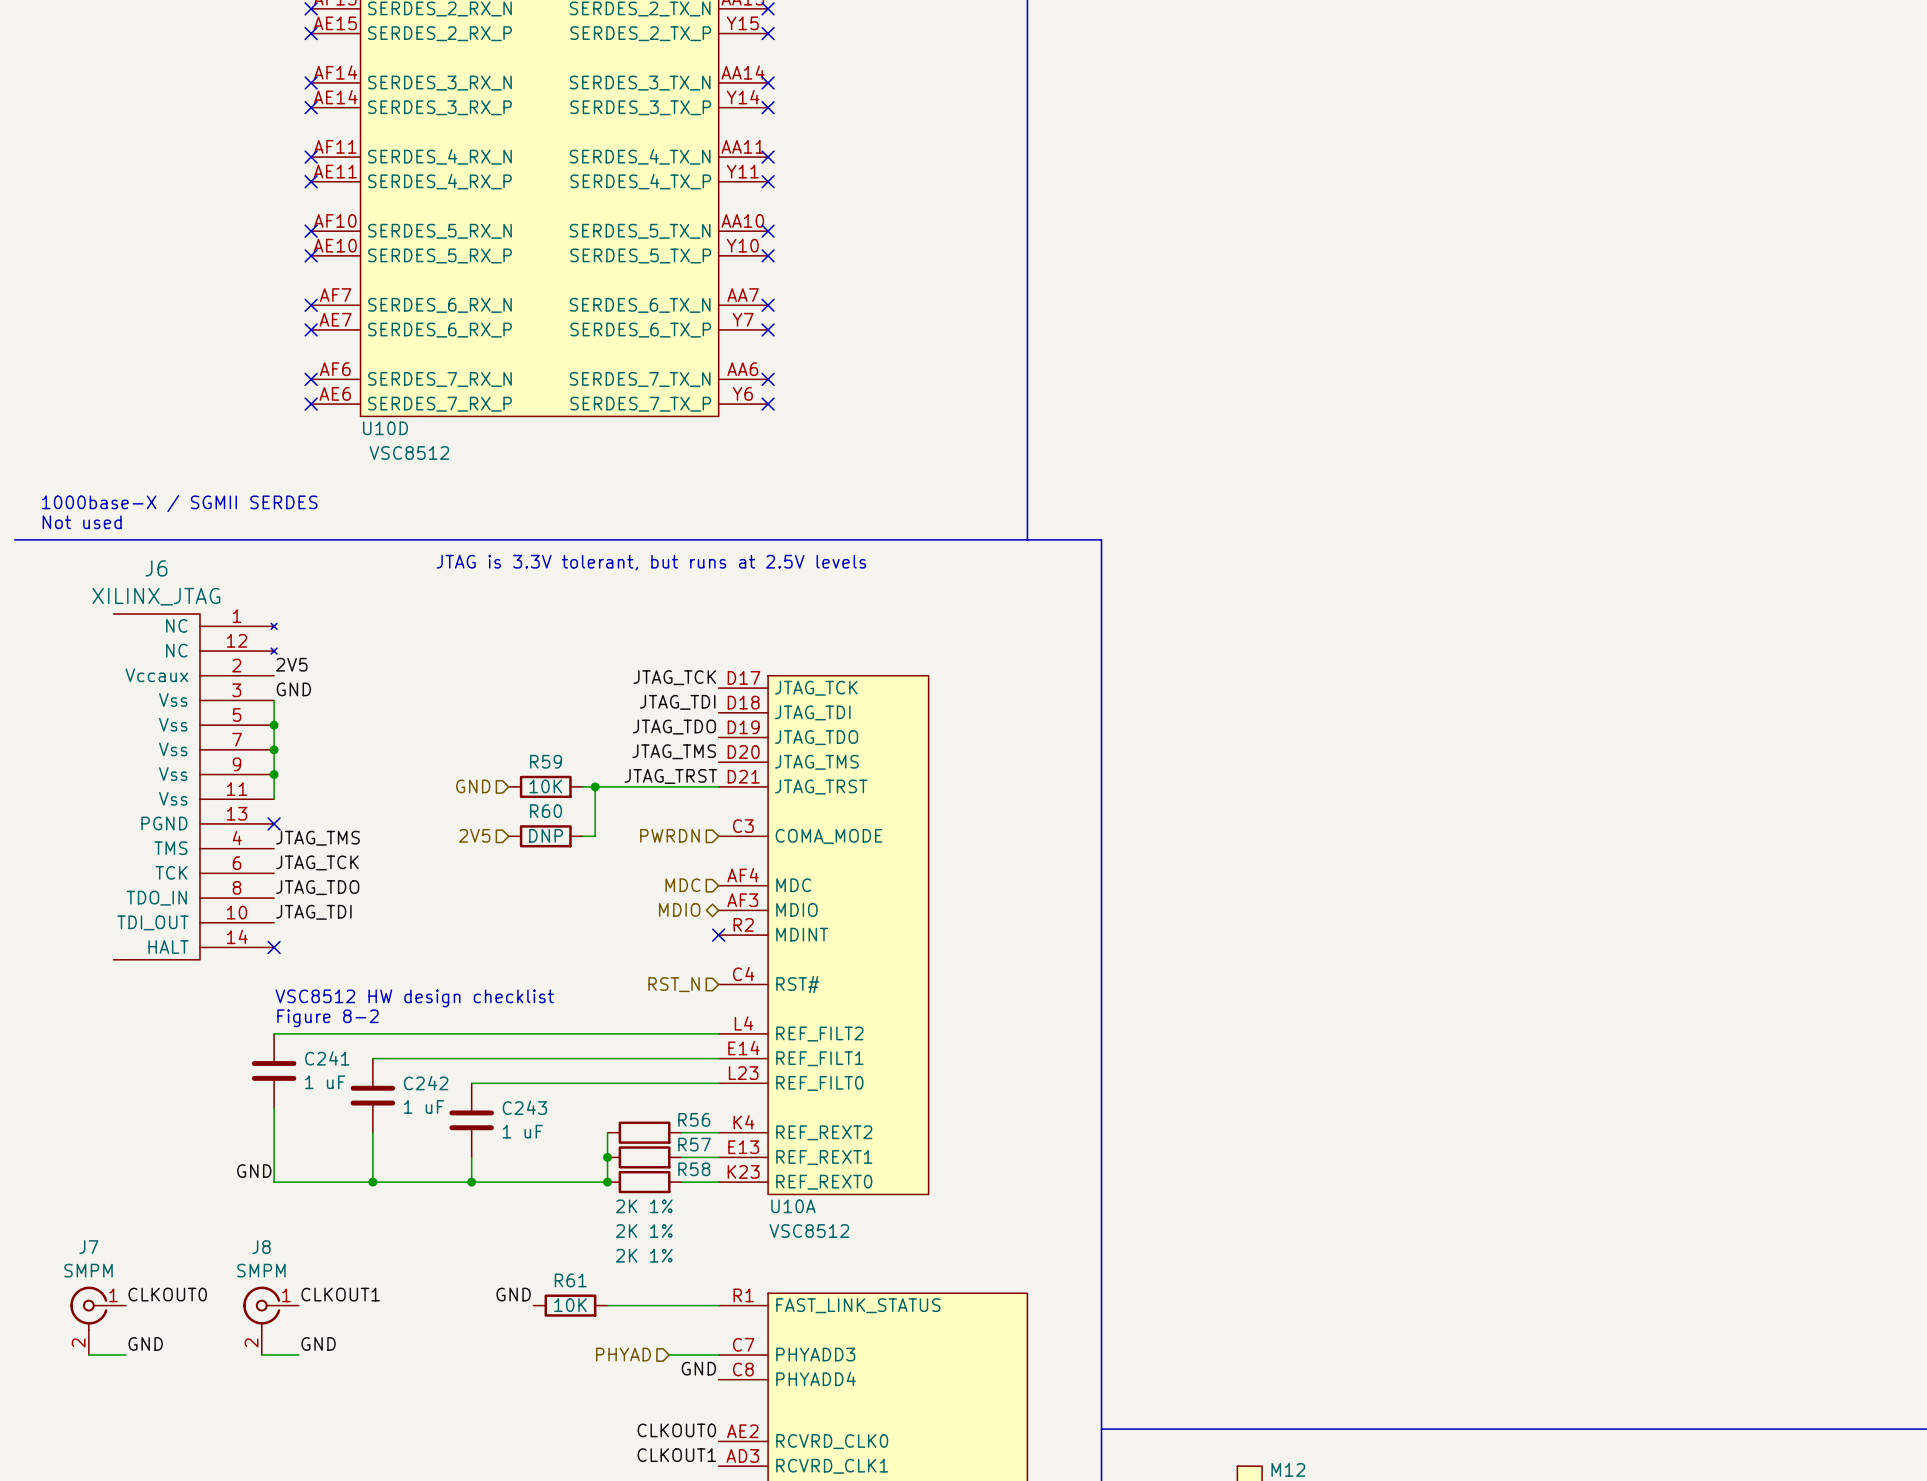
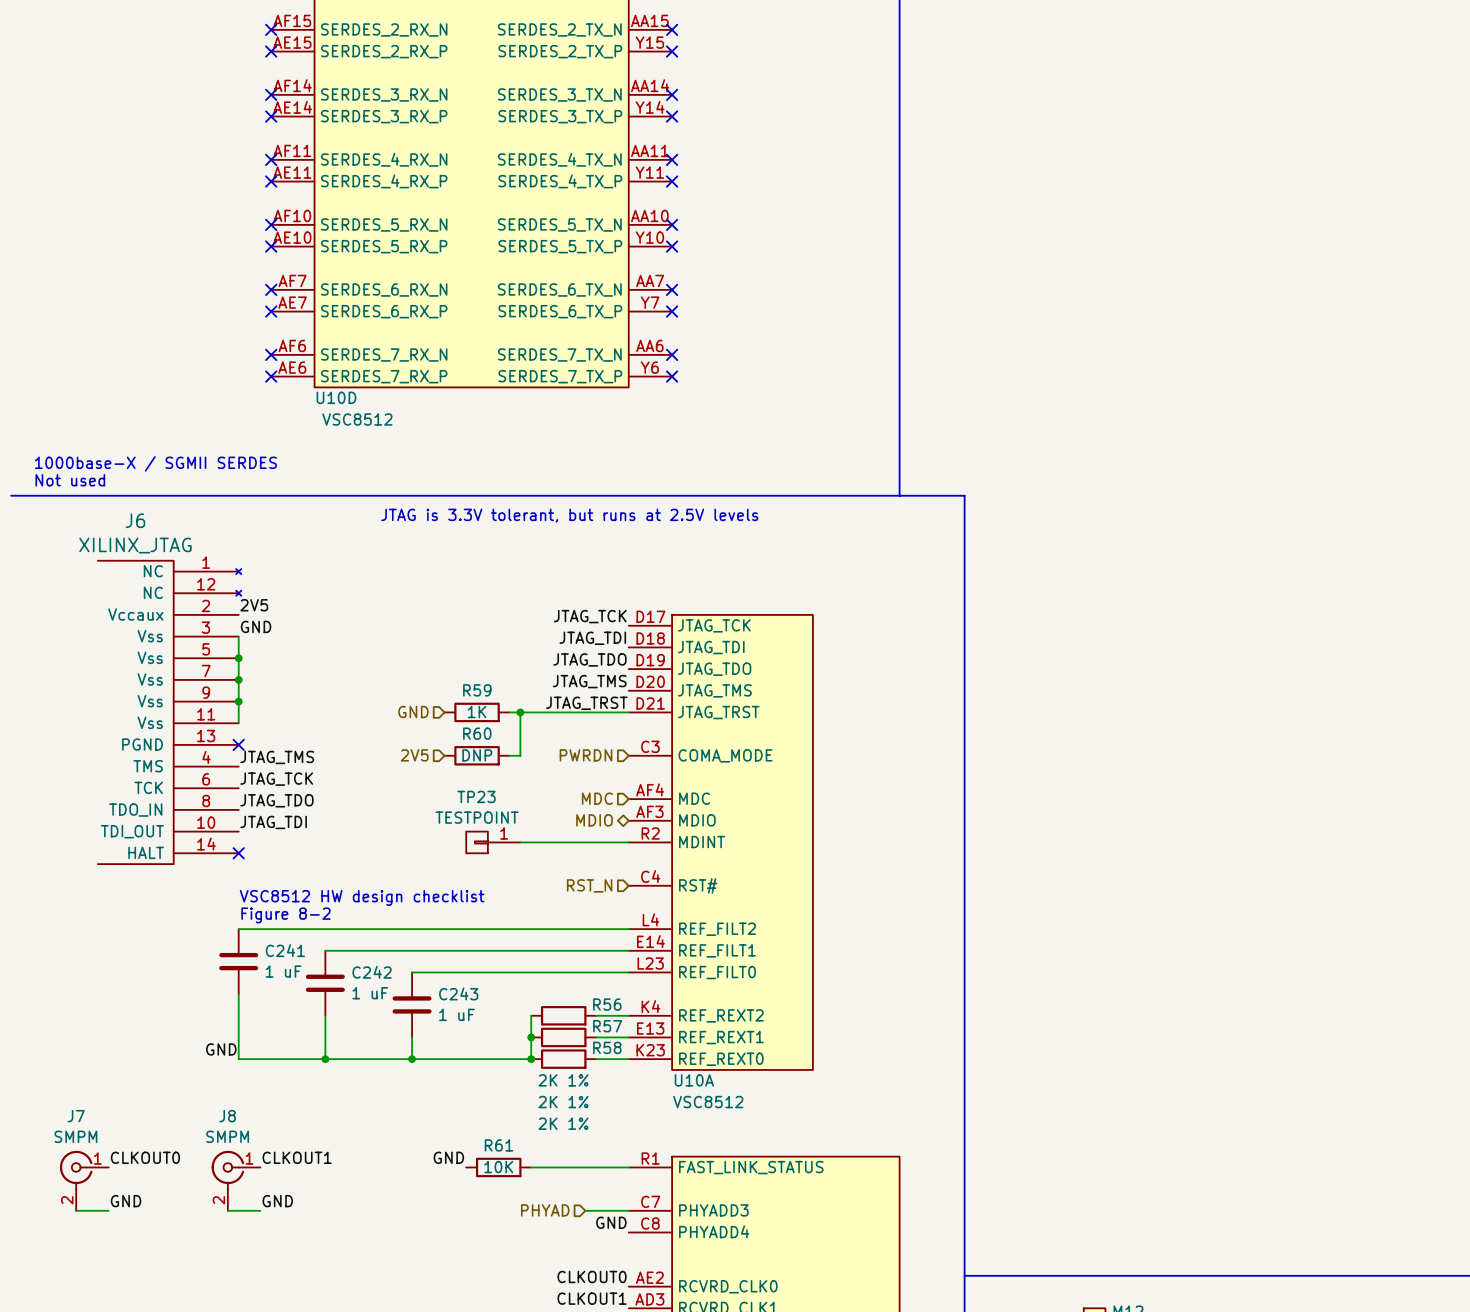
R59 value: 10K (545, 786) -> 1K (477, 712)
TP23: none -> TESTPOINT (493, 842)
wire: none -> (520, 842) (628, 842)
no-connect mark: (718, 935) -> none

